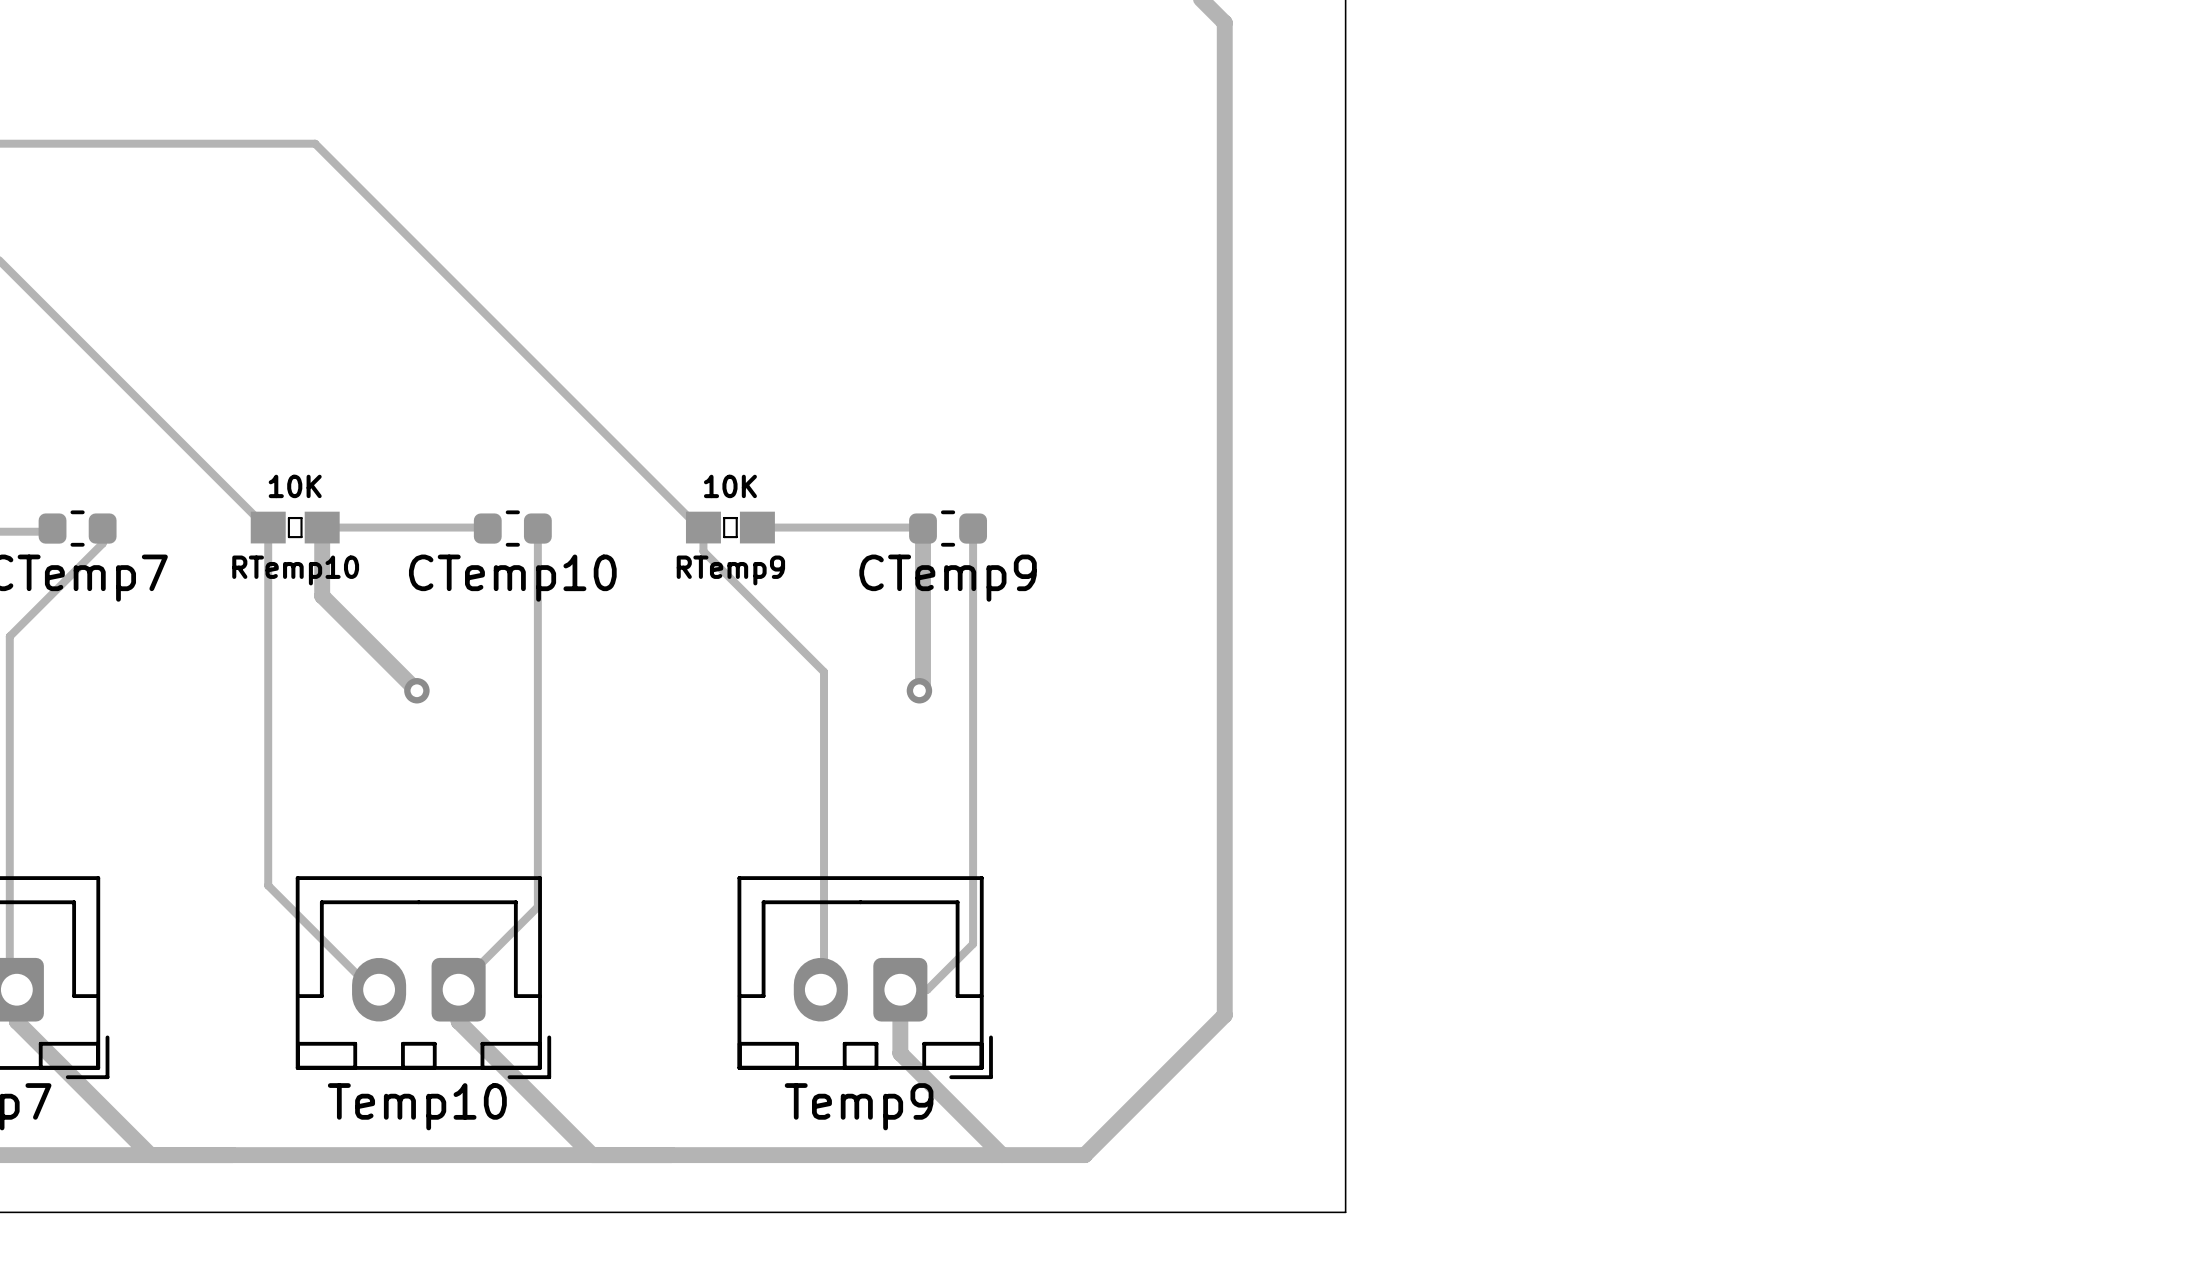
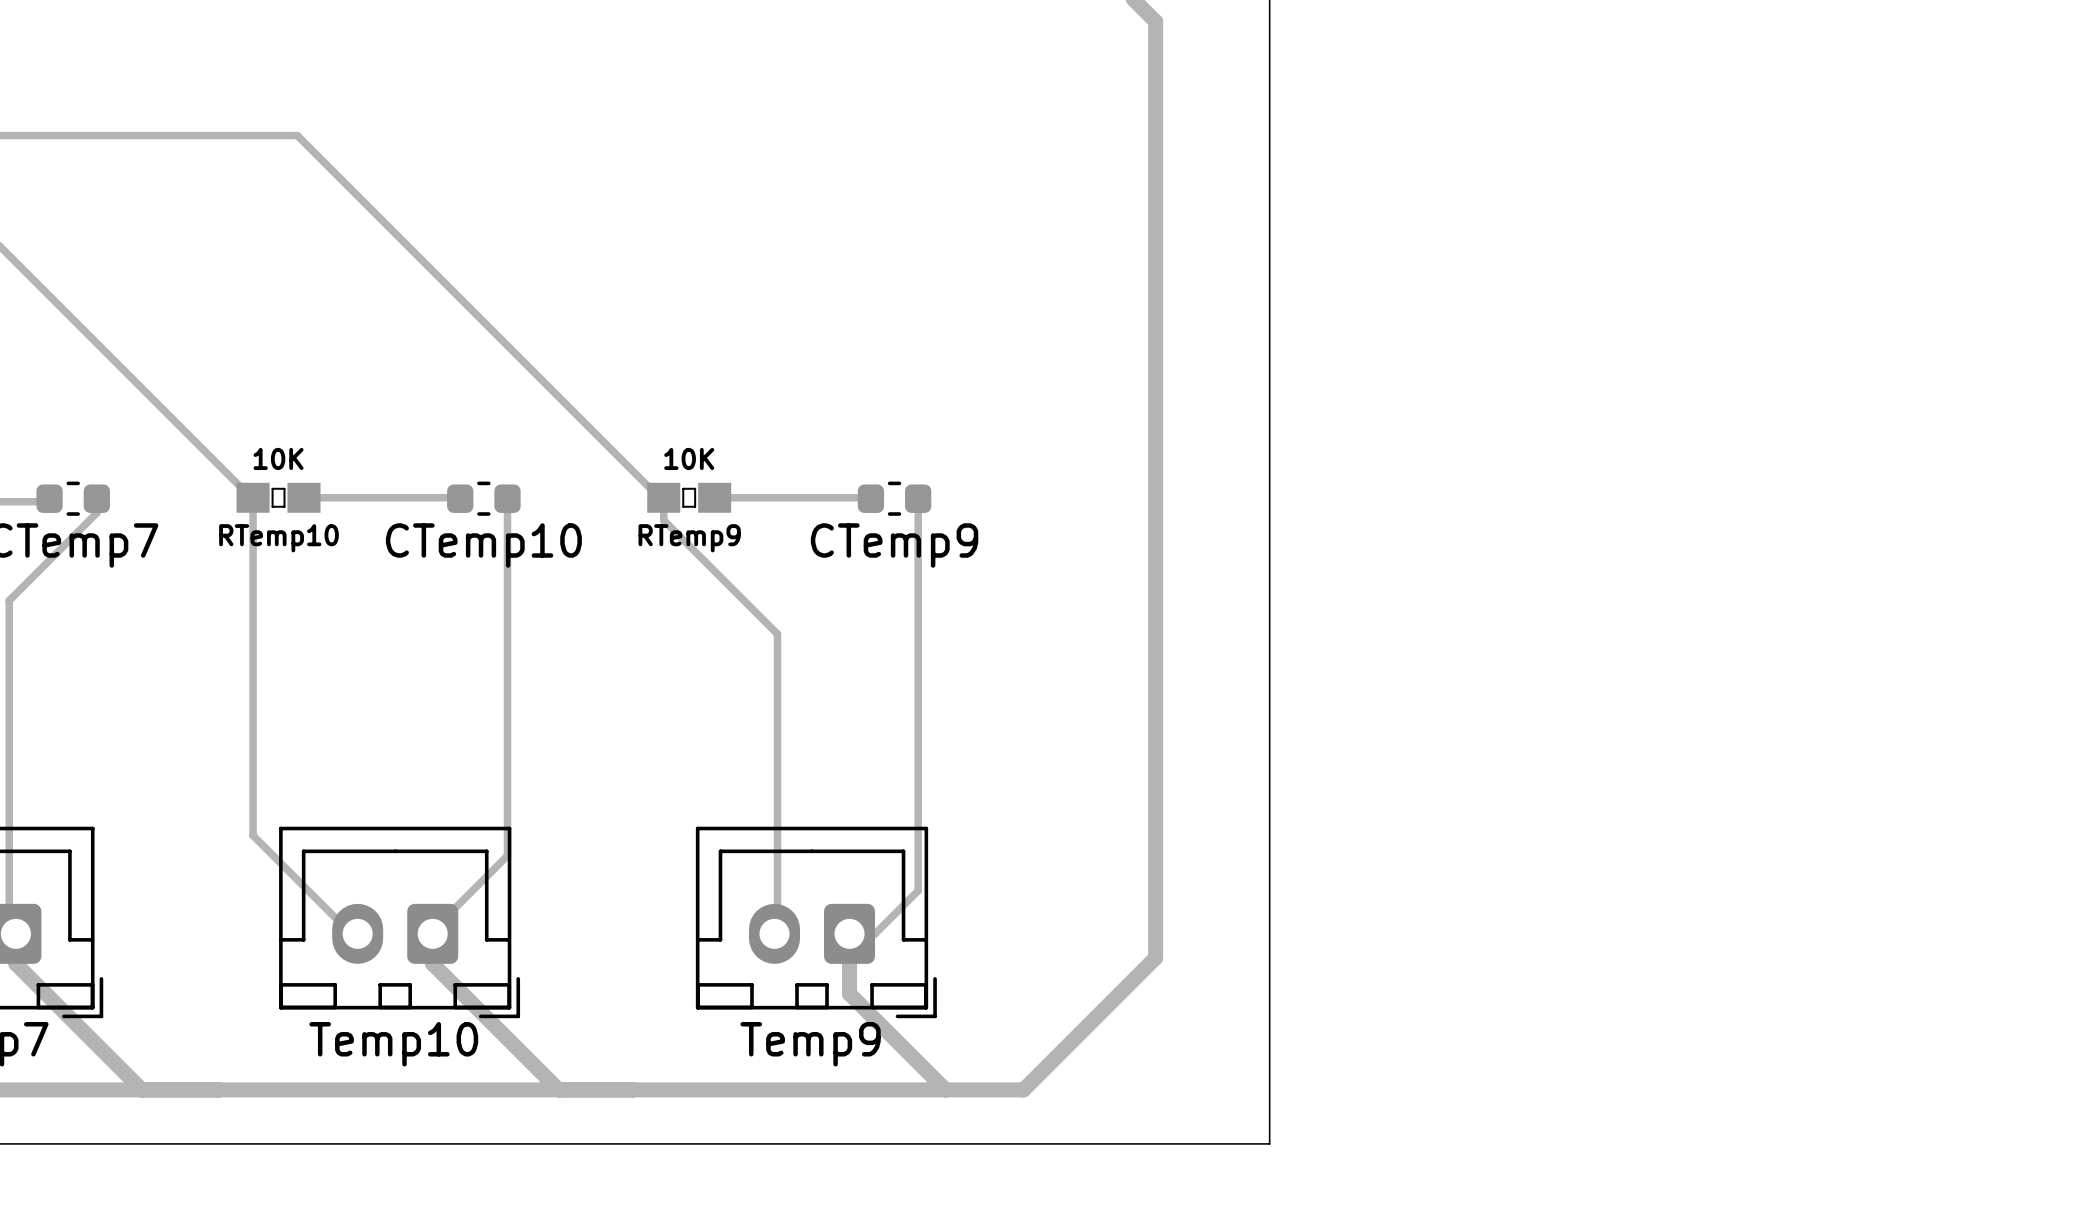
track: (322, 527) (322, 596) (416, 690) -> none
track: (923, 528) (923, 687) (919, 690) -> none
via: (416, 690) -> none
via: (919, 690) -> none

